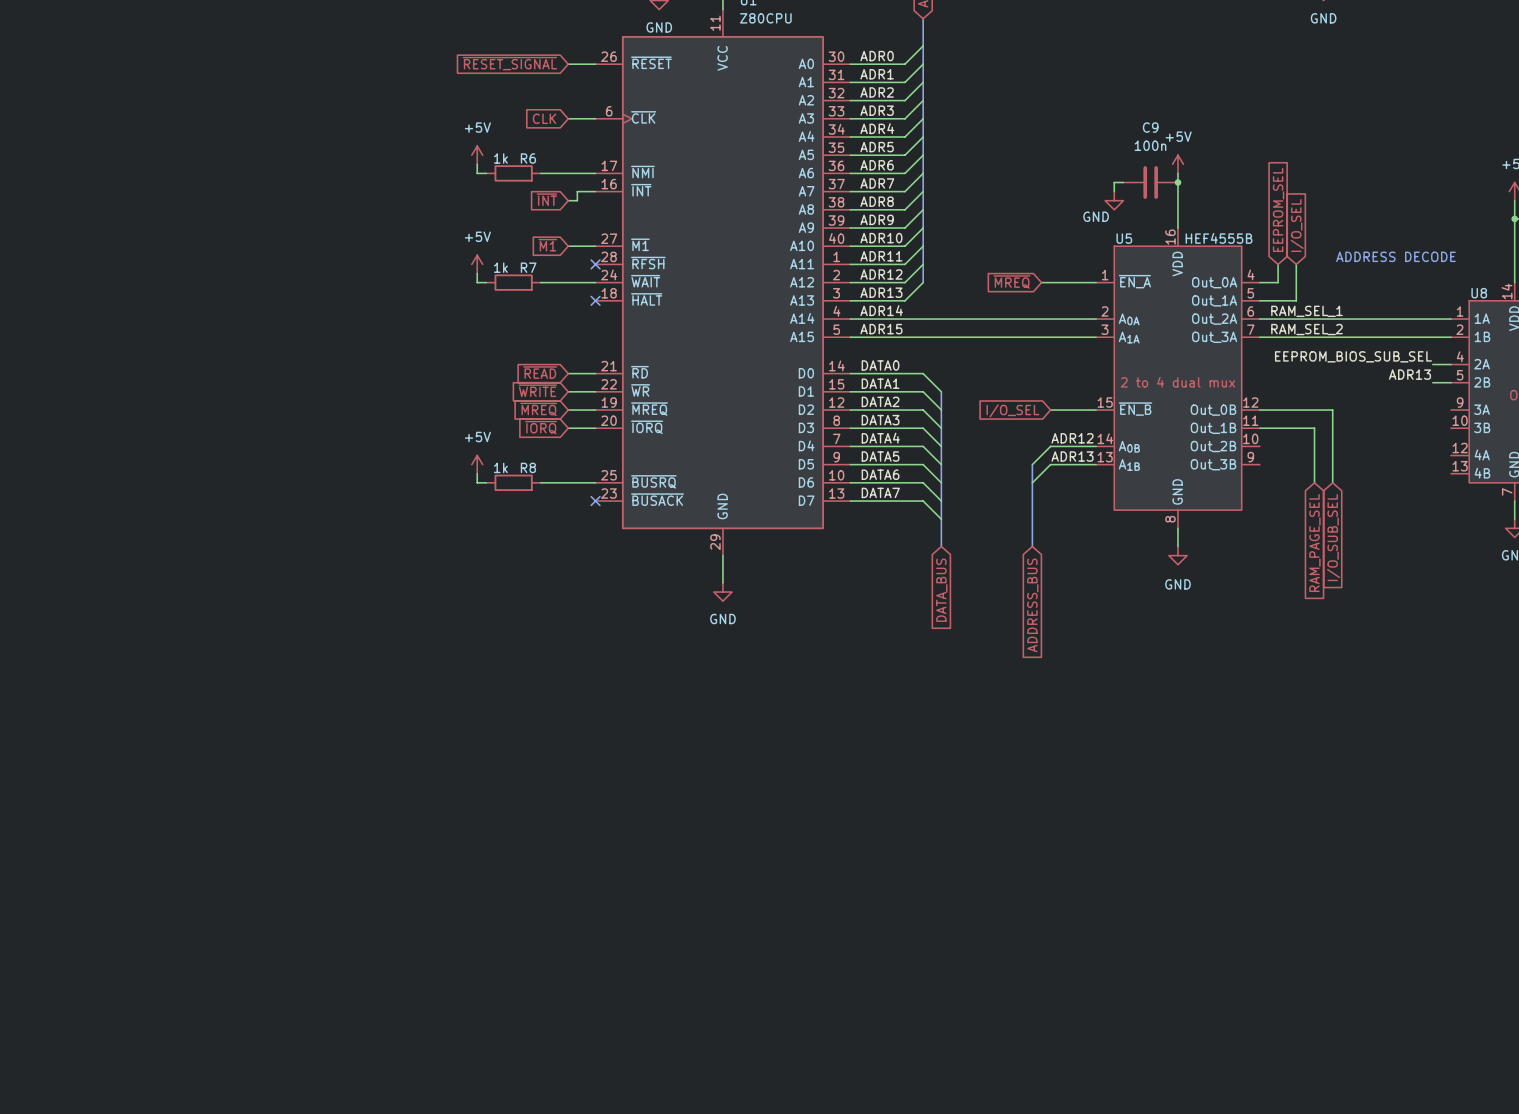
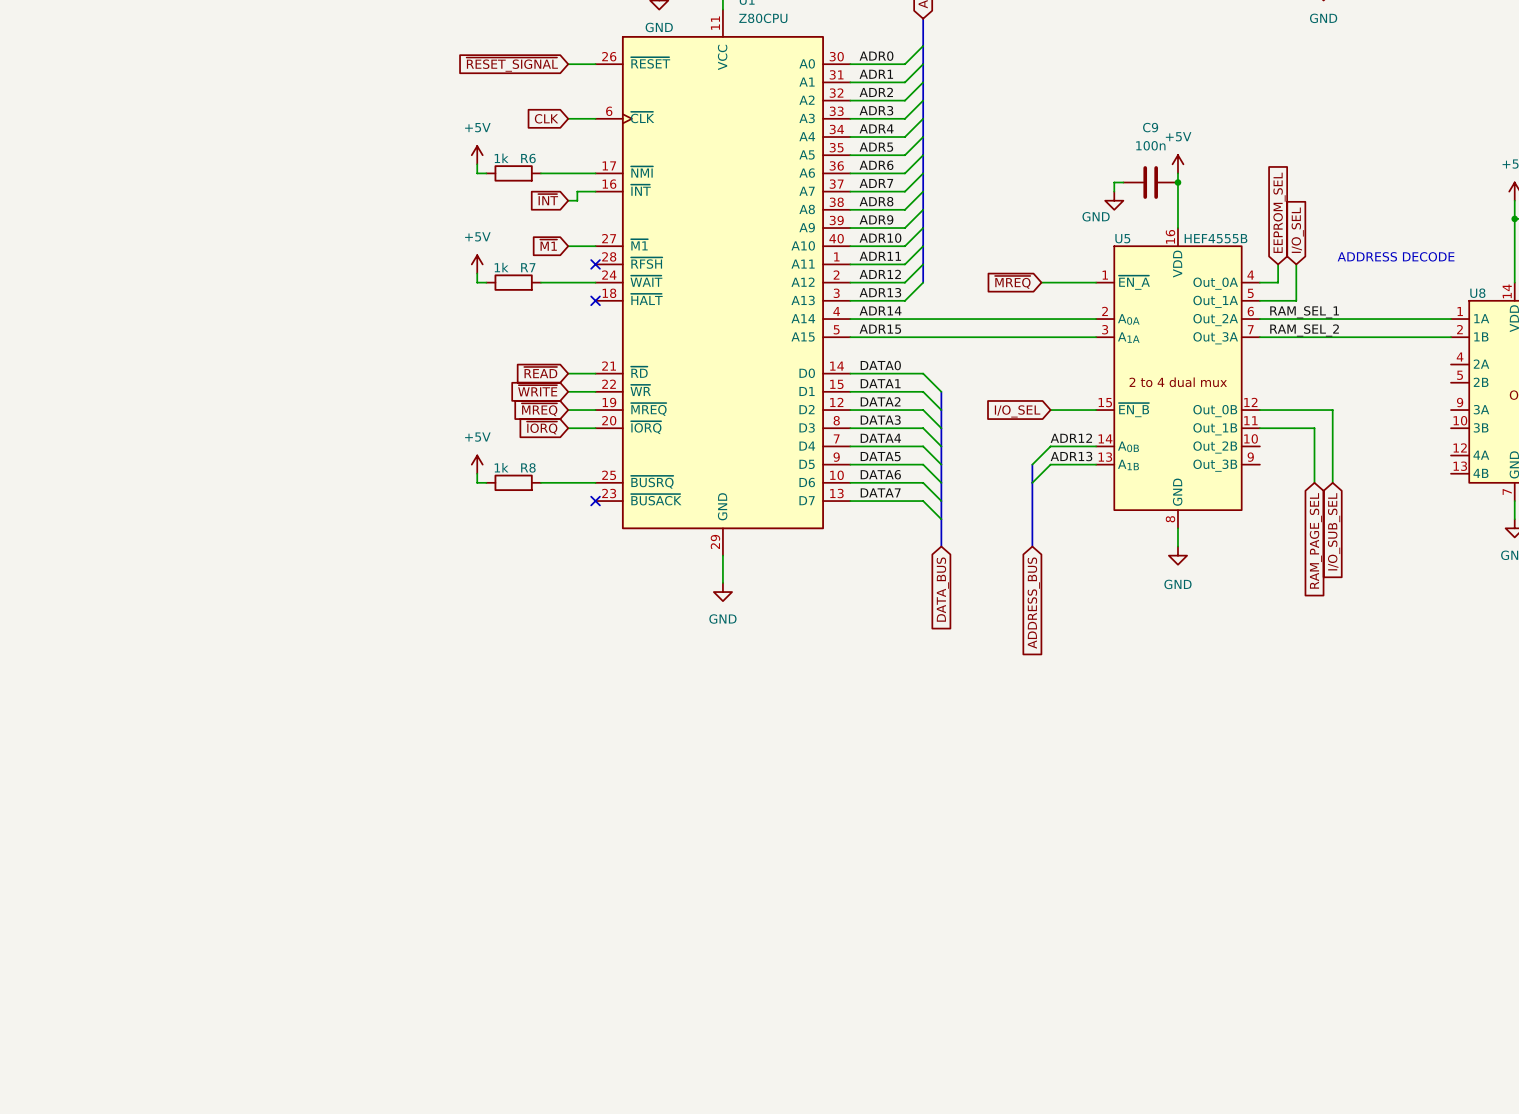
label: EEPROM_BIOS_SUB_SEL (1353, 356) -> none
wire: (1432, 364) (1451, 364) -> none
label: ADR13 (1409, 374) -> none
wire: (1432, 382) (1451, 382) -> none

